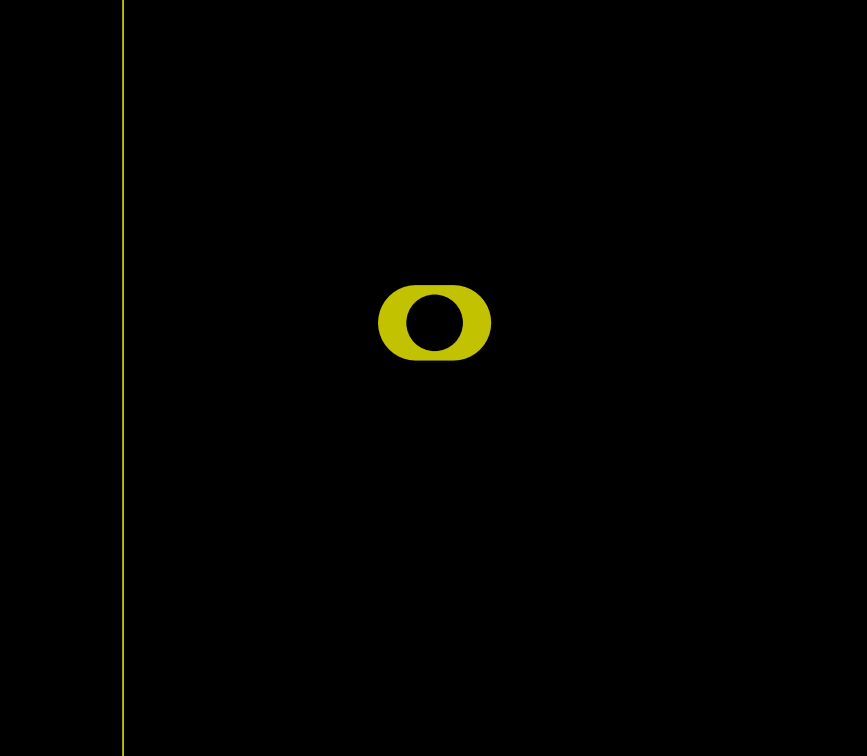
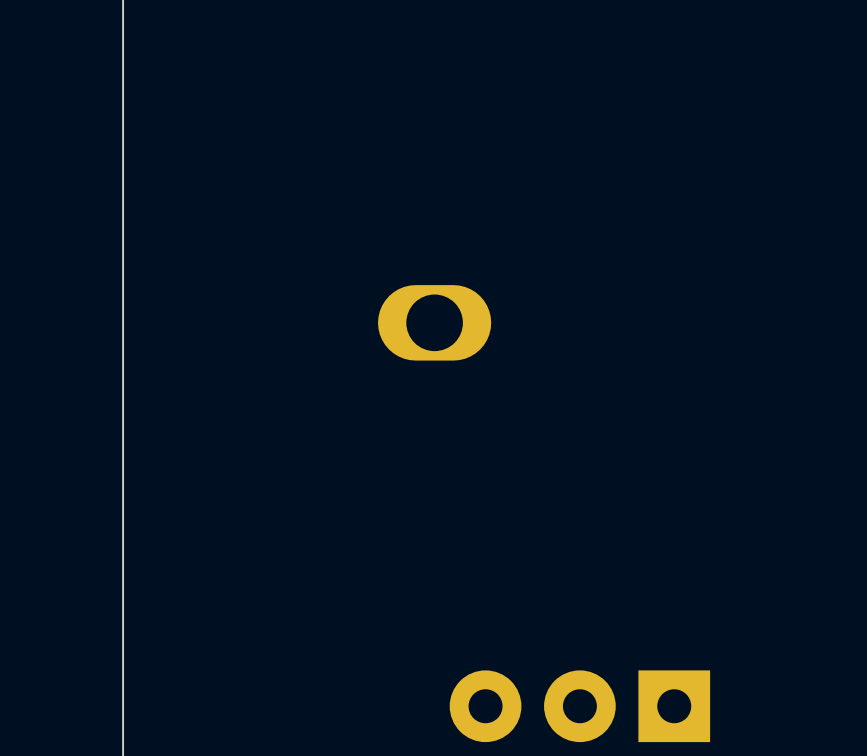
part: none -> (579, 706)

